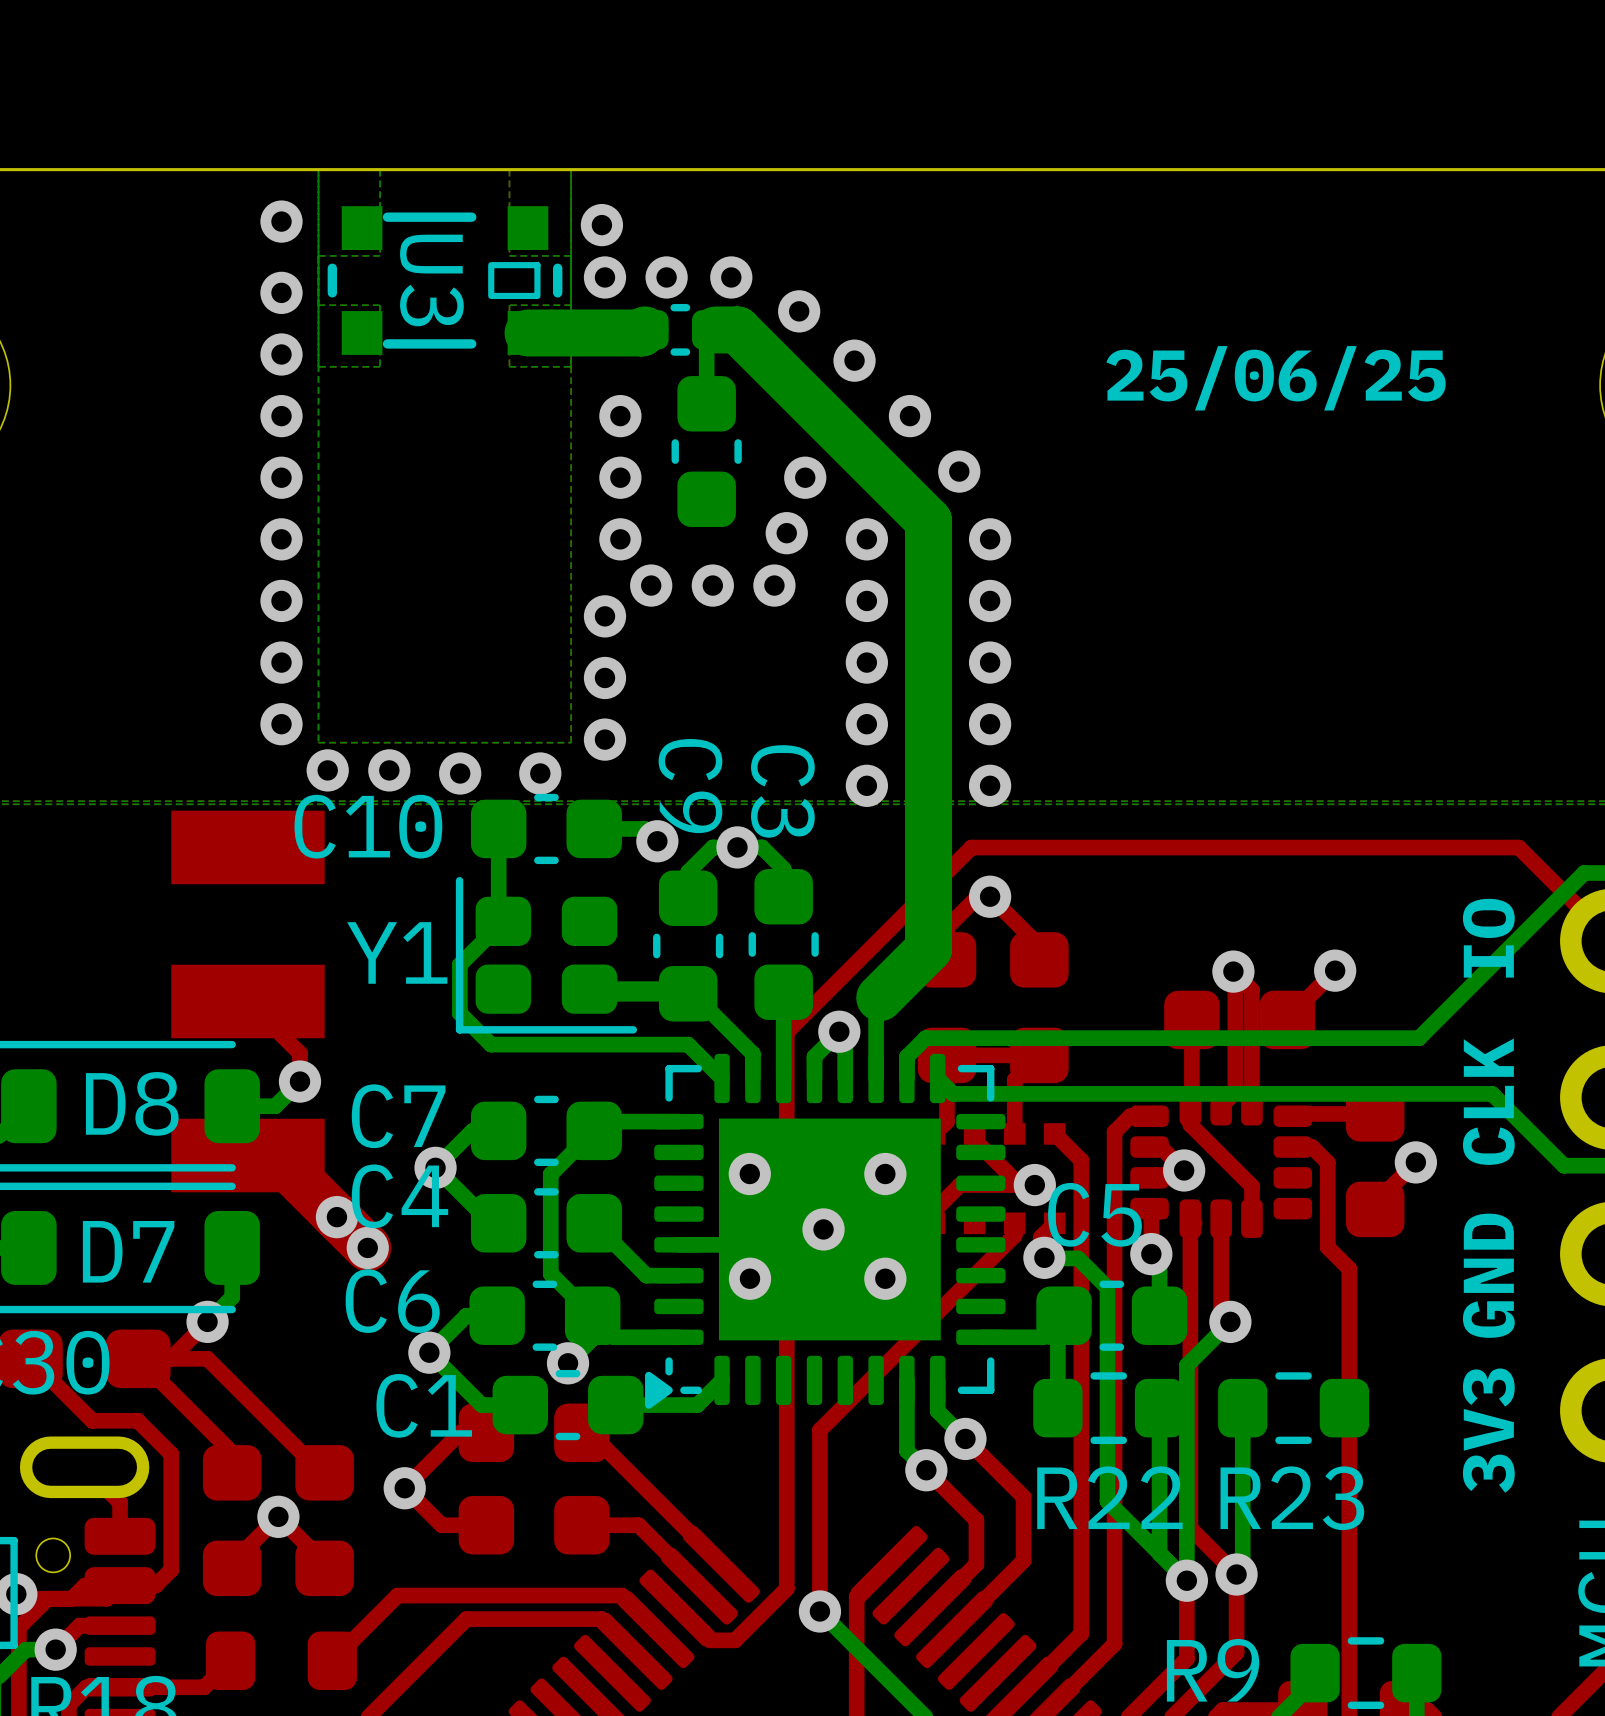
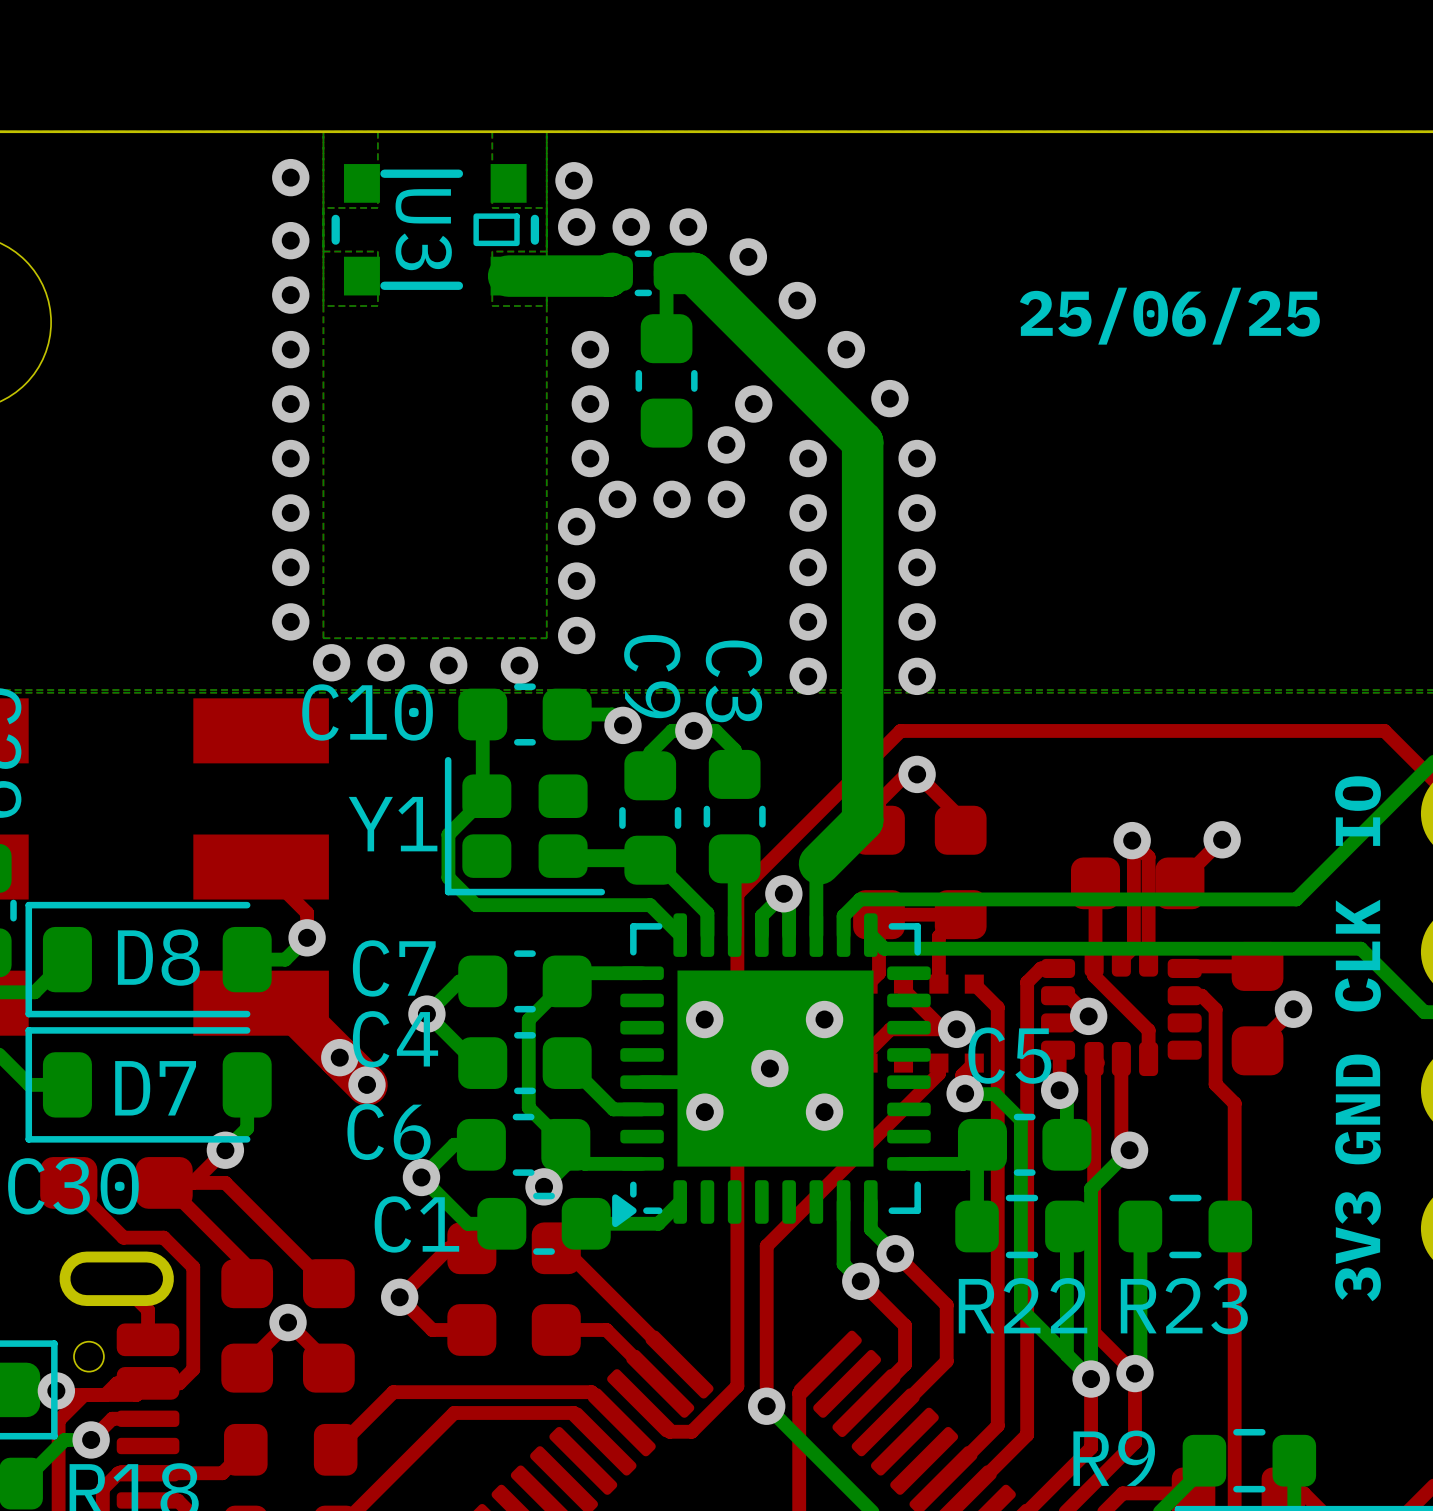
via position: (786, 533) -> (726, 444)

